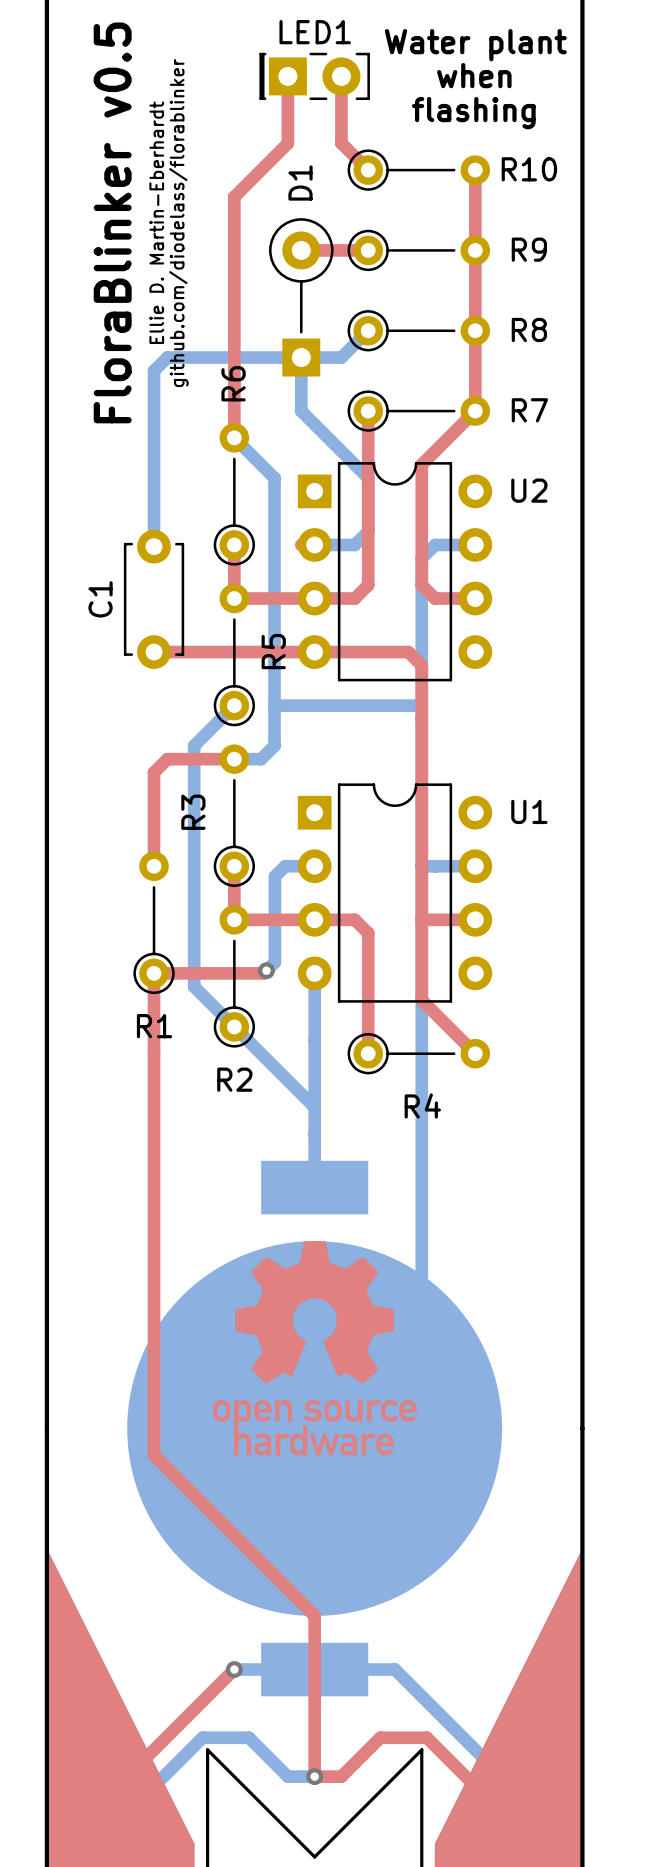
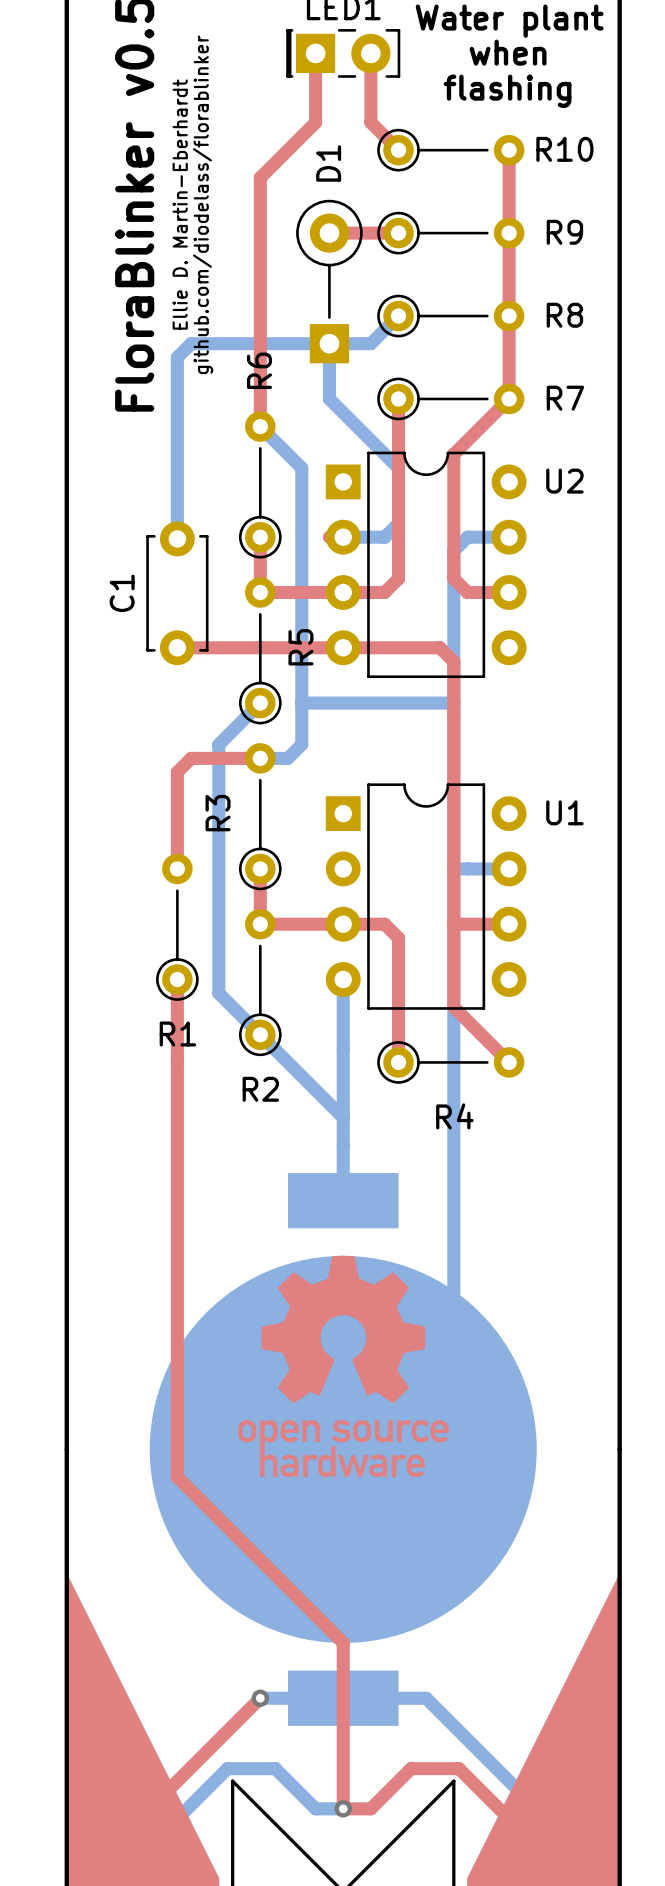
bottom track: (314, 866) (285, 866) (274, 876) (274, 962) (266, 970) -> none
top track: (266, 970) (263, 973) (154, 973) -> none
via: (266, 970) -> none

